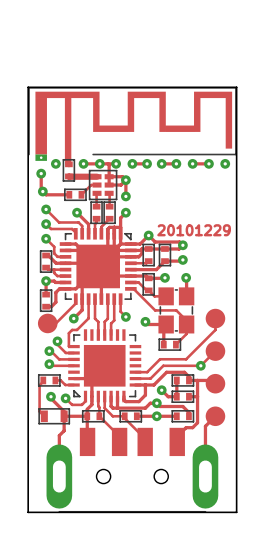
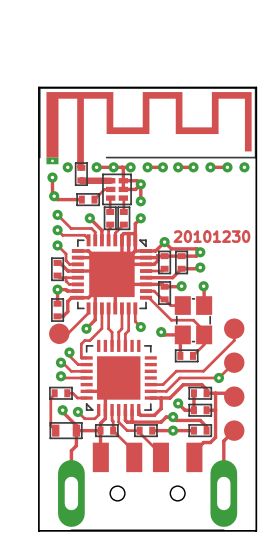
text: 20101229 (194, 230) -> 20101230 (211, 236)

